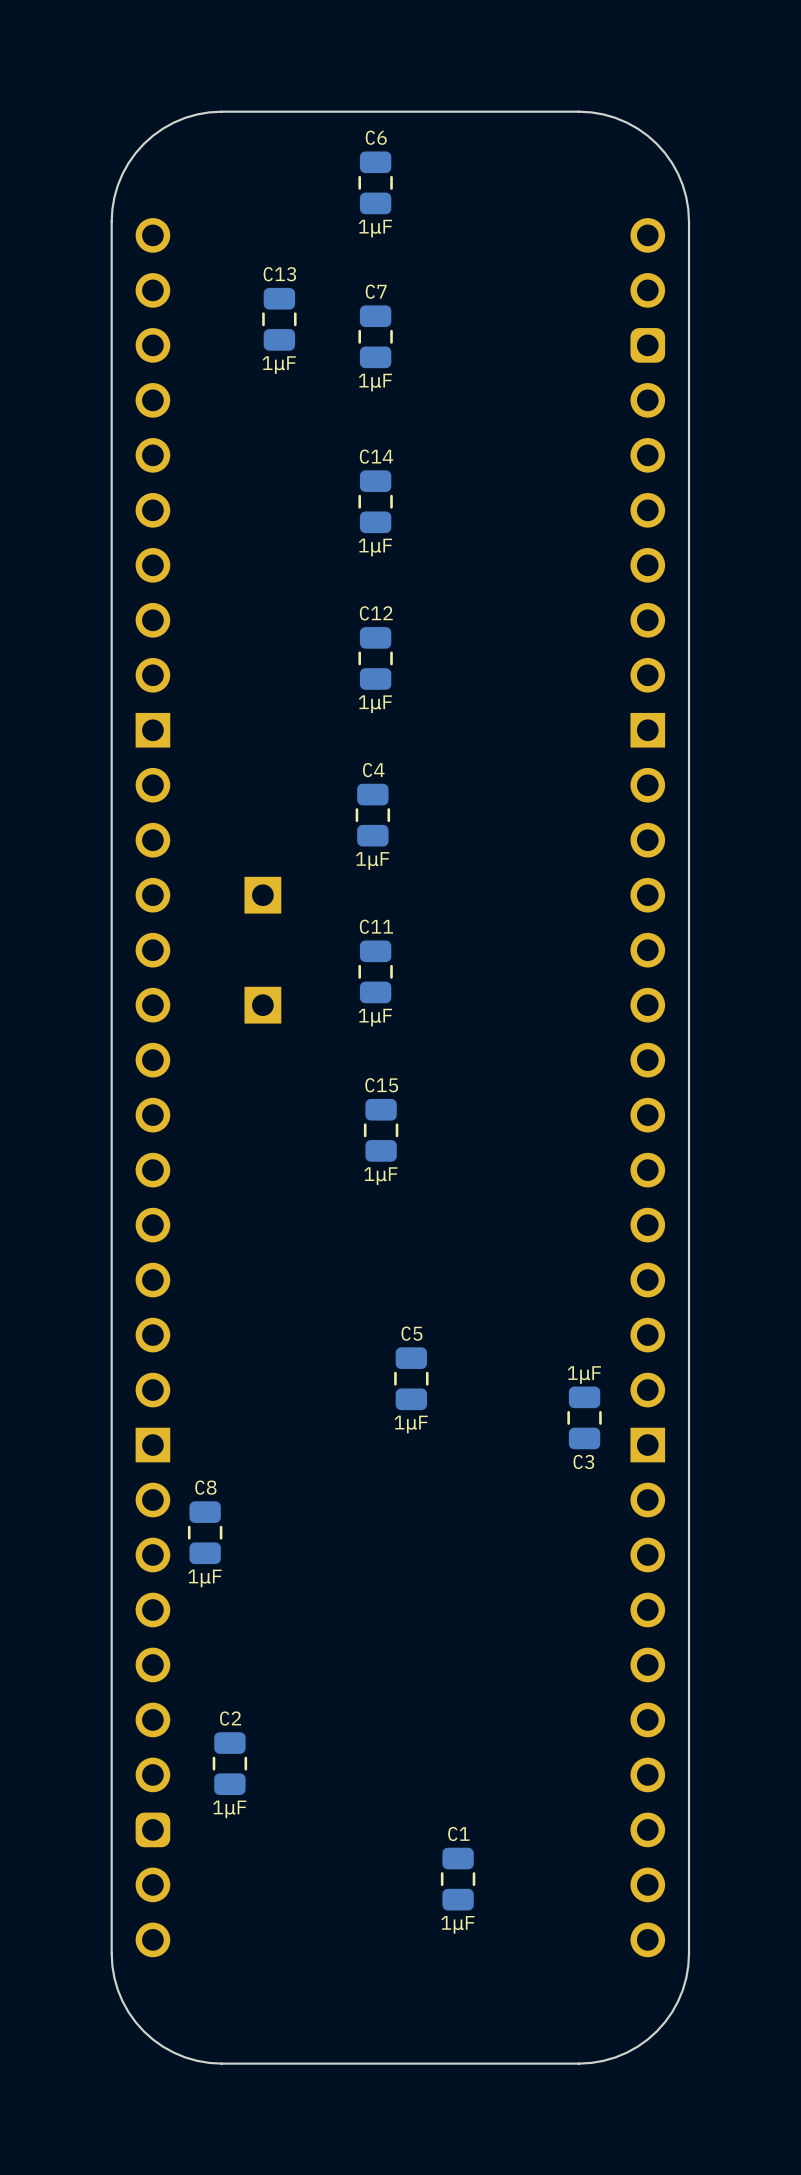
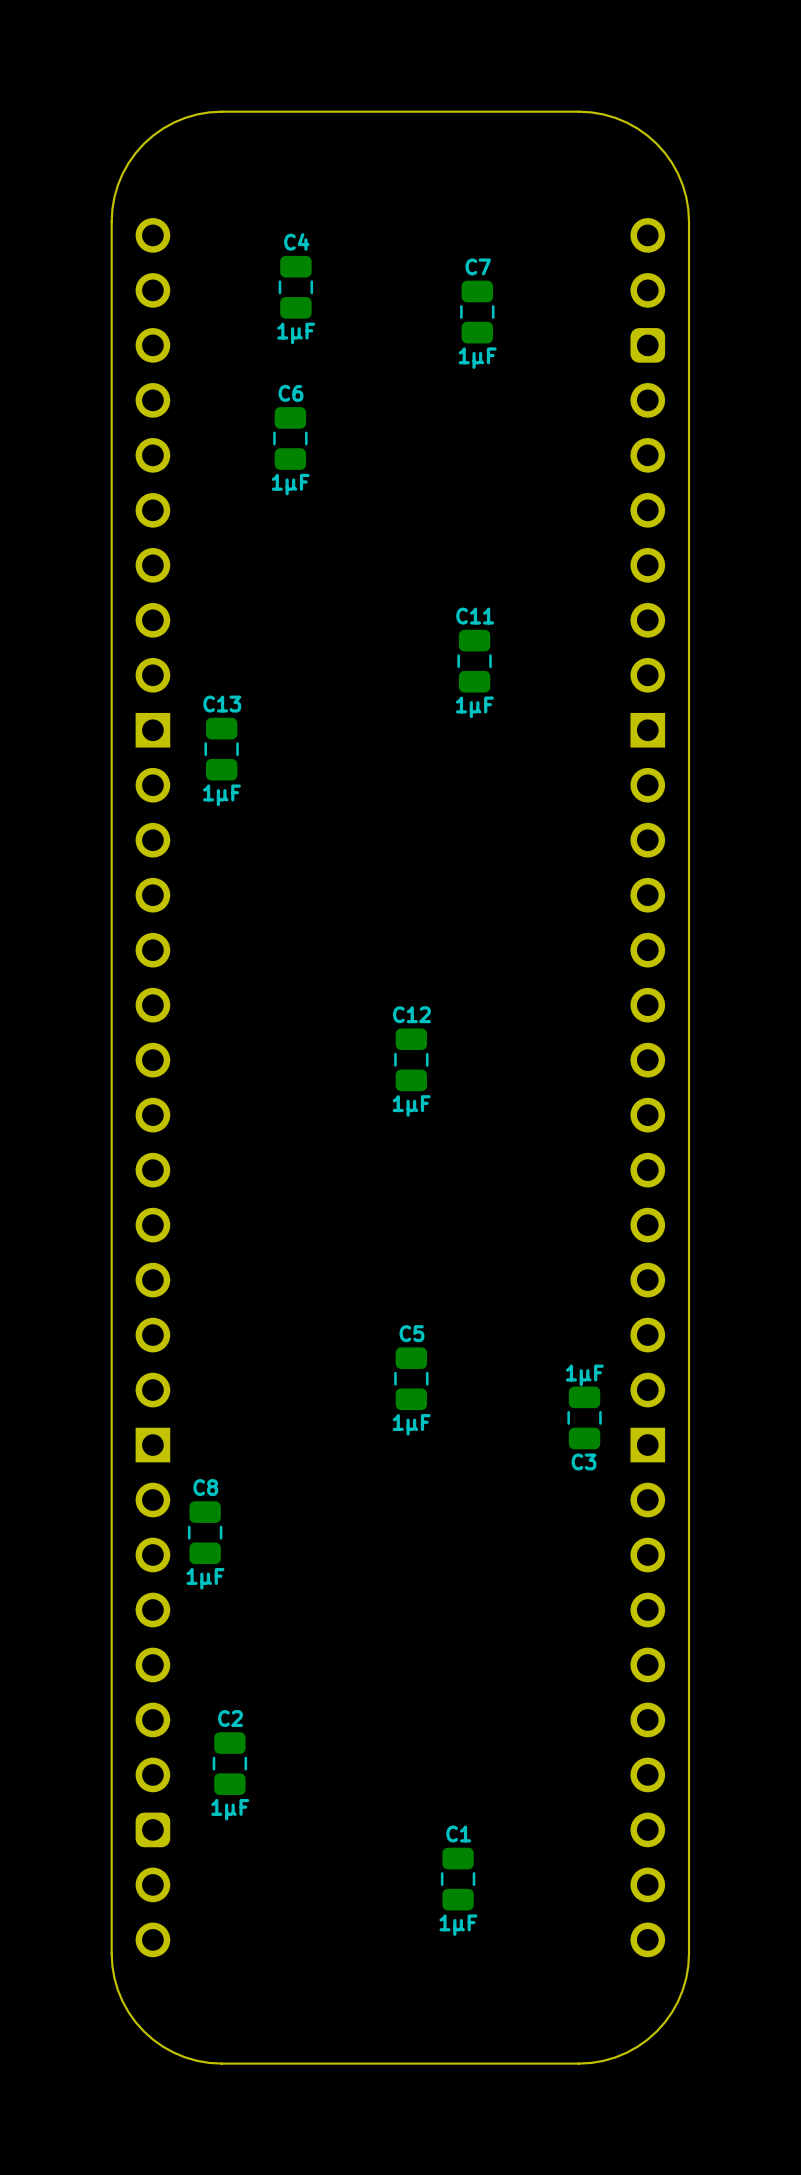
C6 position: (375, 182) -> (290, 438)
C13 position: (279, 319) -> (221, 749)
C7 position: (375, 336) -> (477, 312)
C14: 1μF (375, 501) -> none
C12 position: (375, 658) -> (411, 1059)
C4 position: (372, 815) -> (295, 287)
part: (262, 895) -> none
C11 position: (375, 971) -> (474, 661)
part: (262, 1005) -> none
C15: 1μF (381, 1130) -> none

